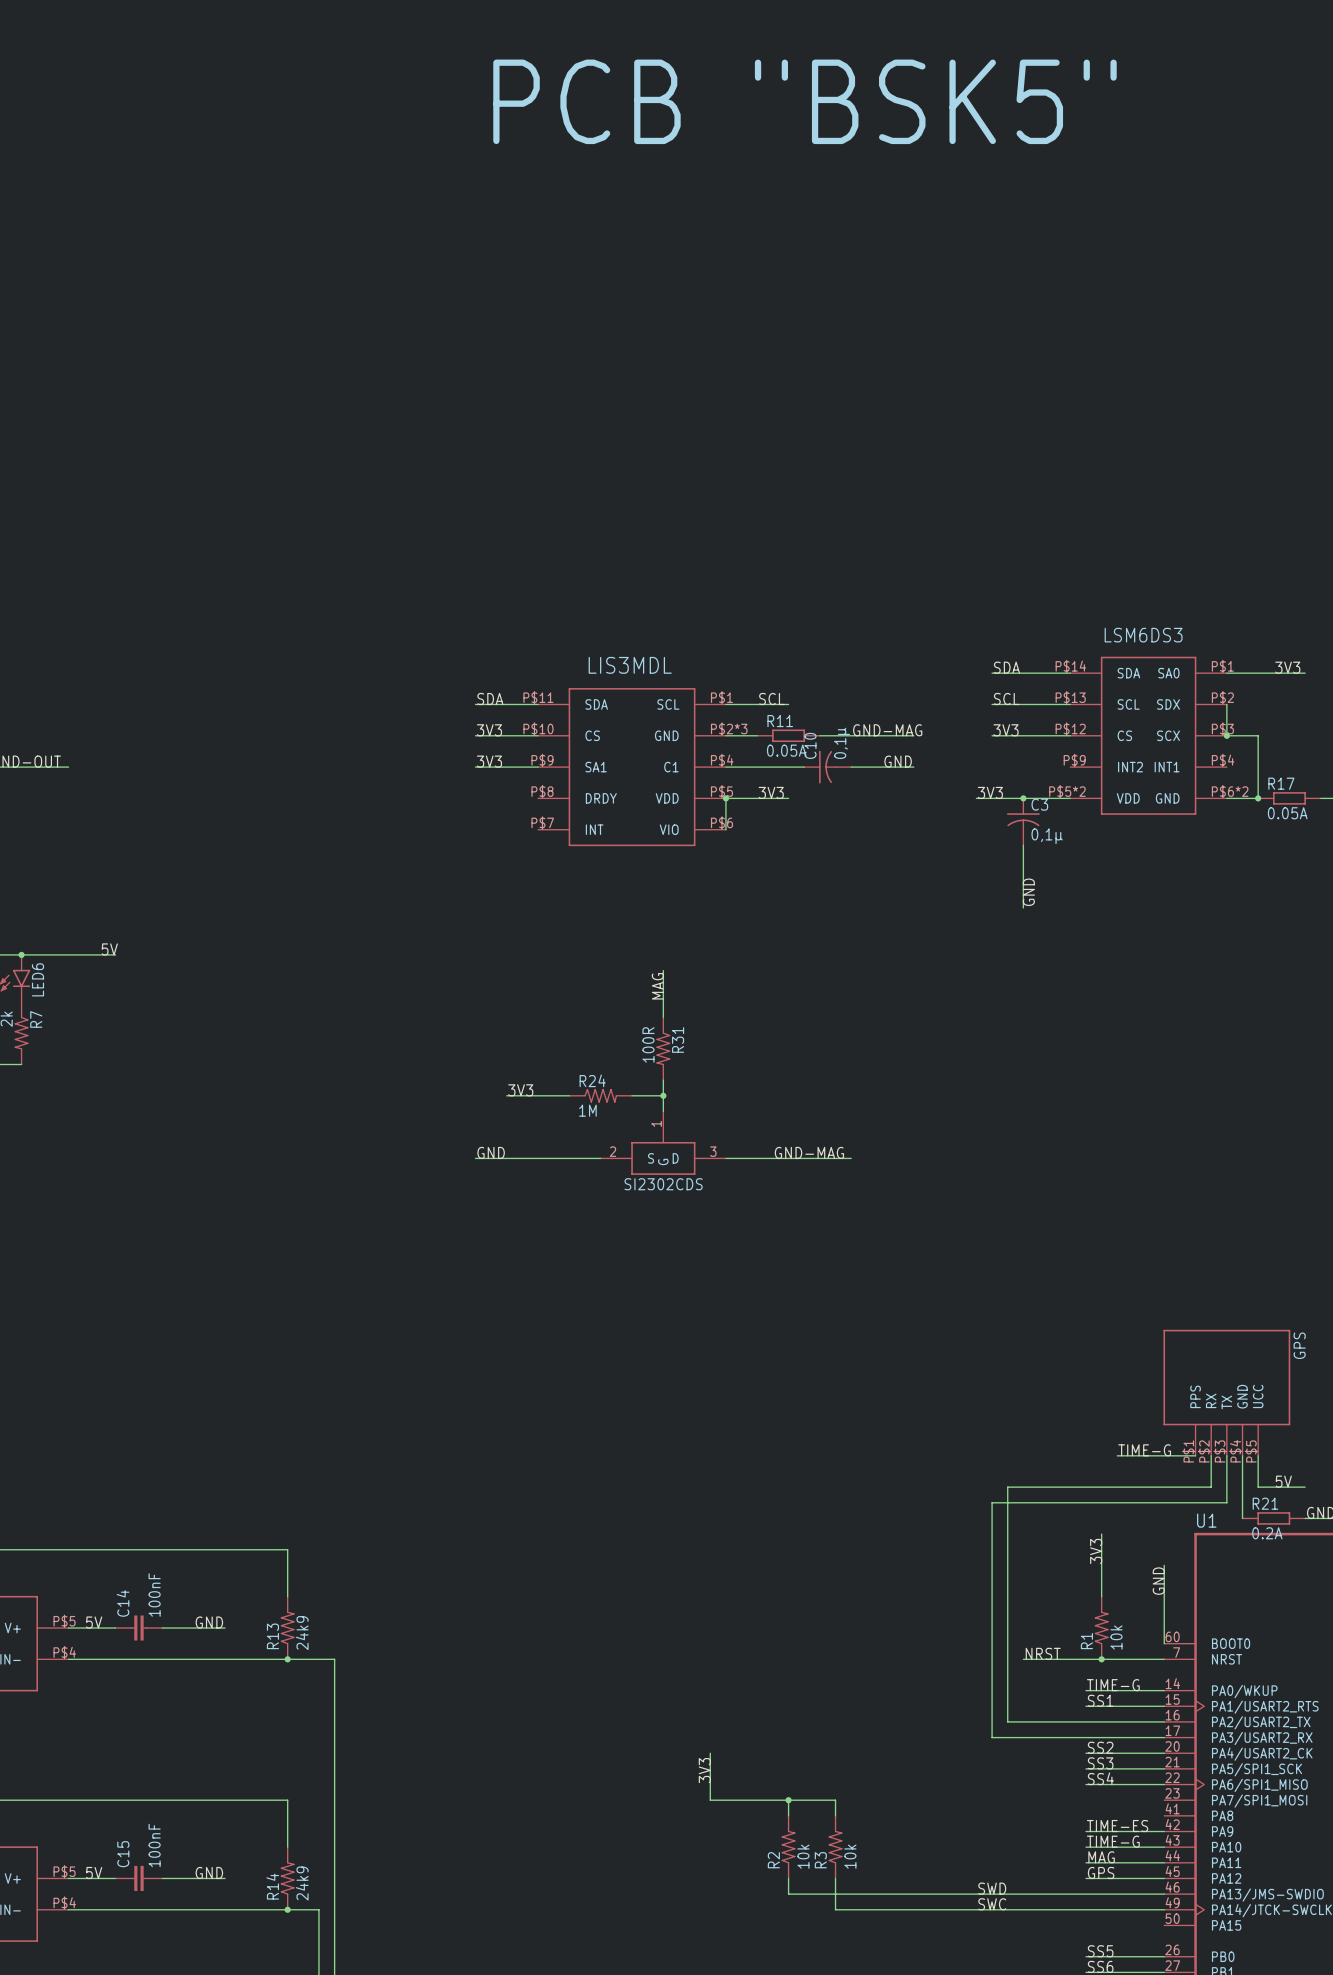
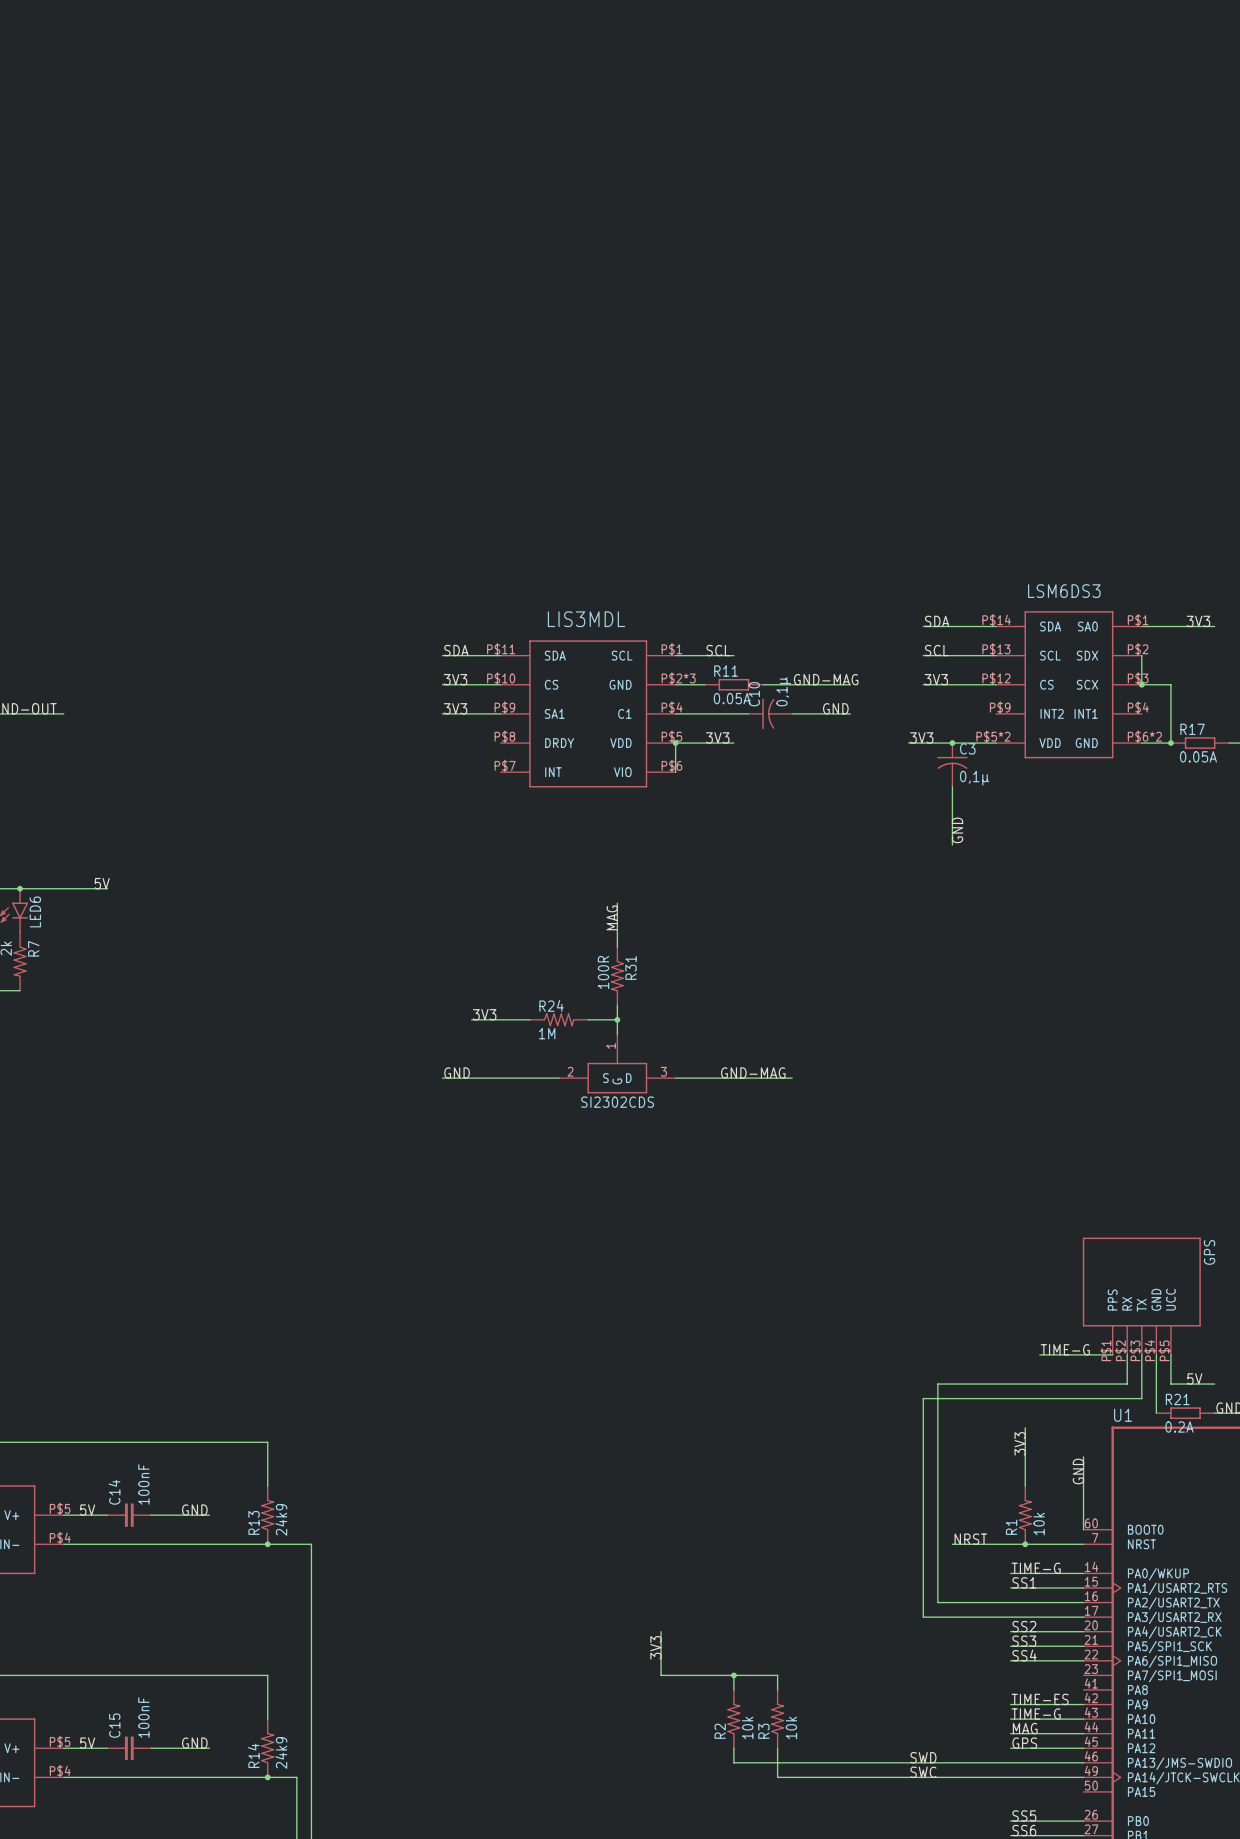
part: PCB "BSK5" (804, 101) -> none

